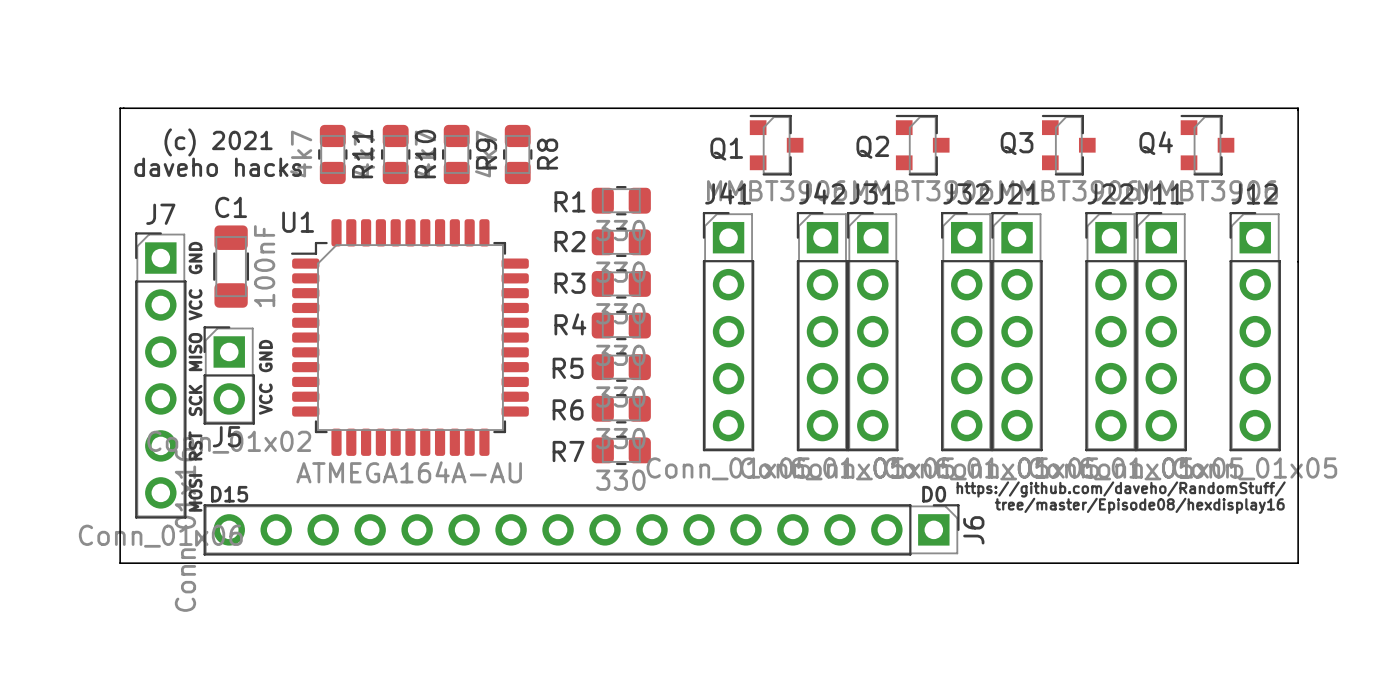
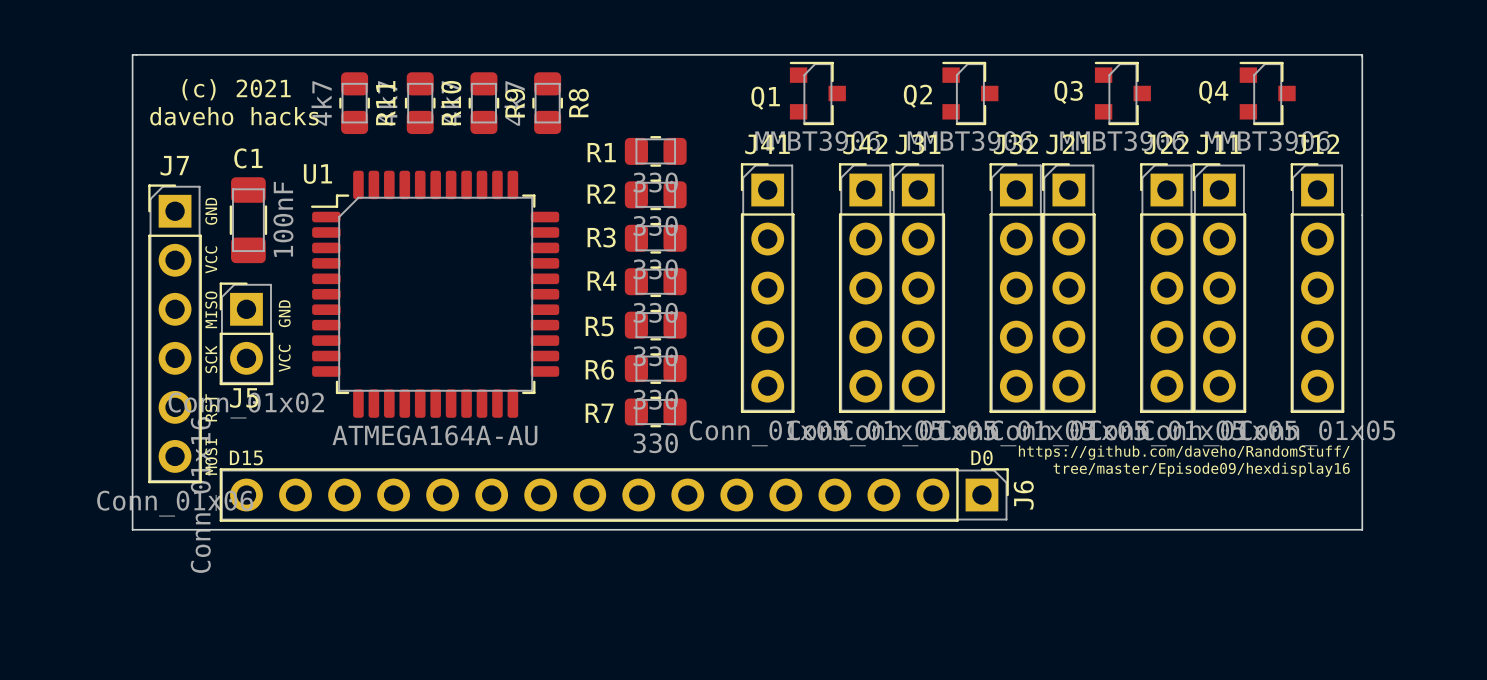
text: tree/master/Episode08/hexdisplay16 (1139, 505) -> tree/master/Episode09/hexdisplay16 (1201, 469)

